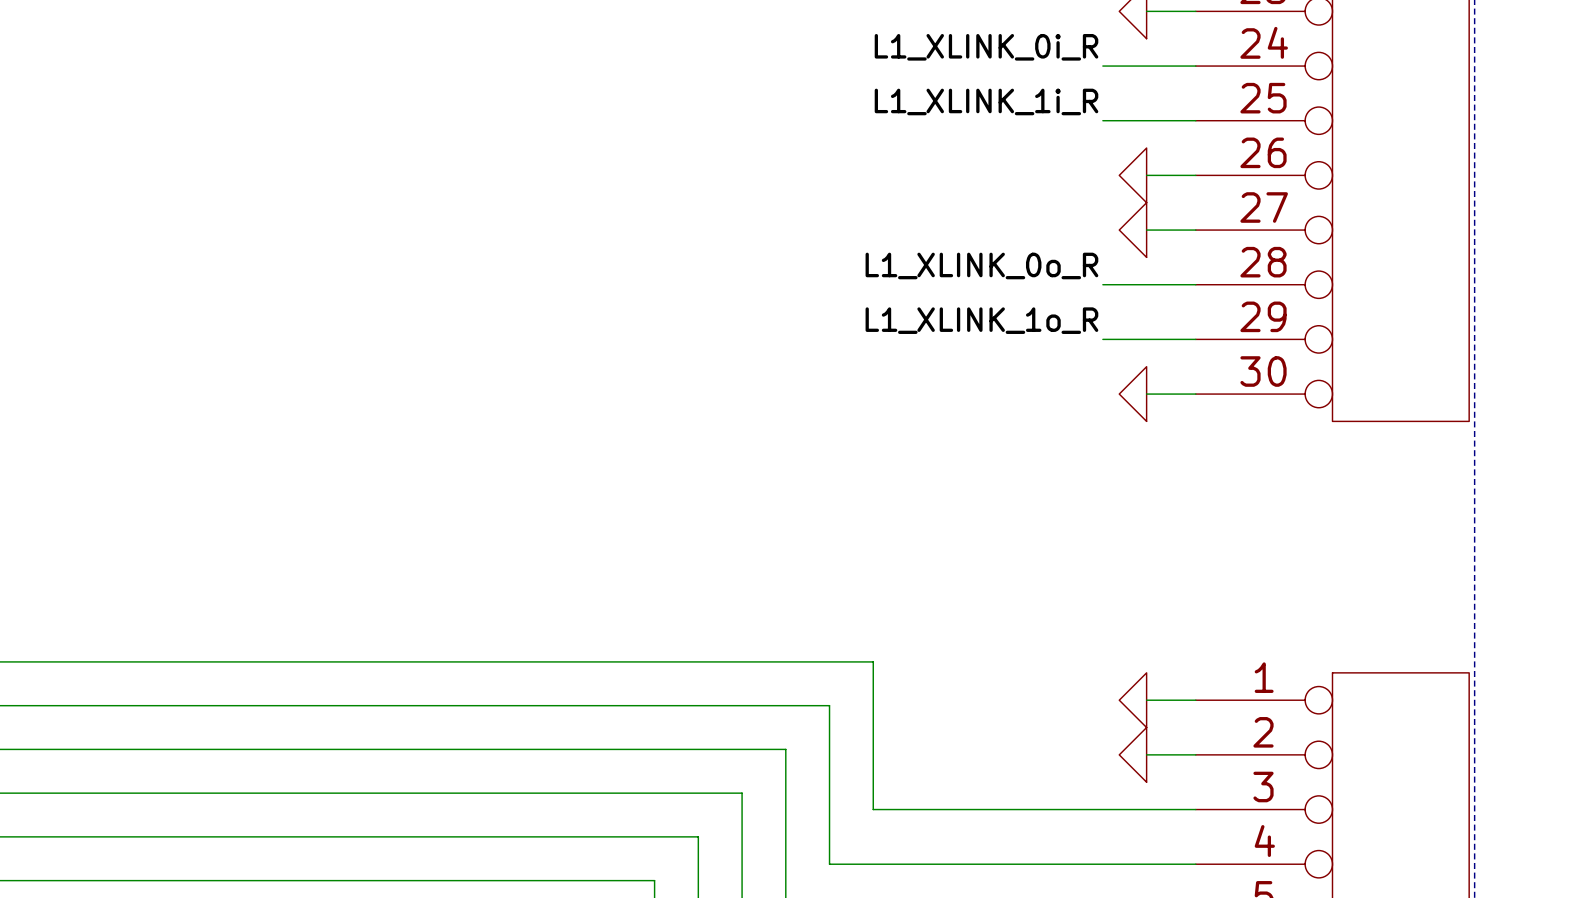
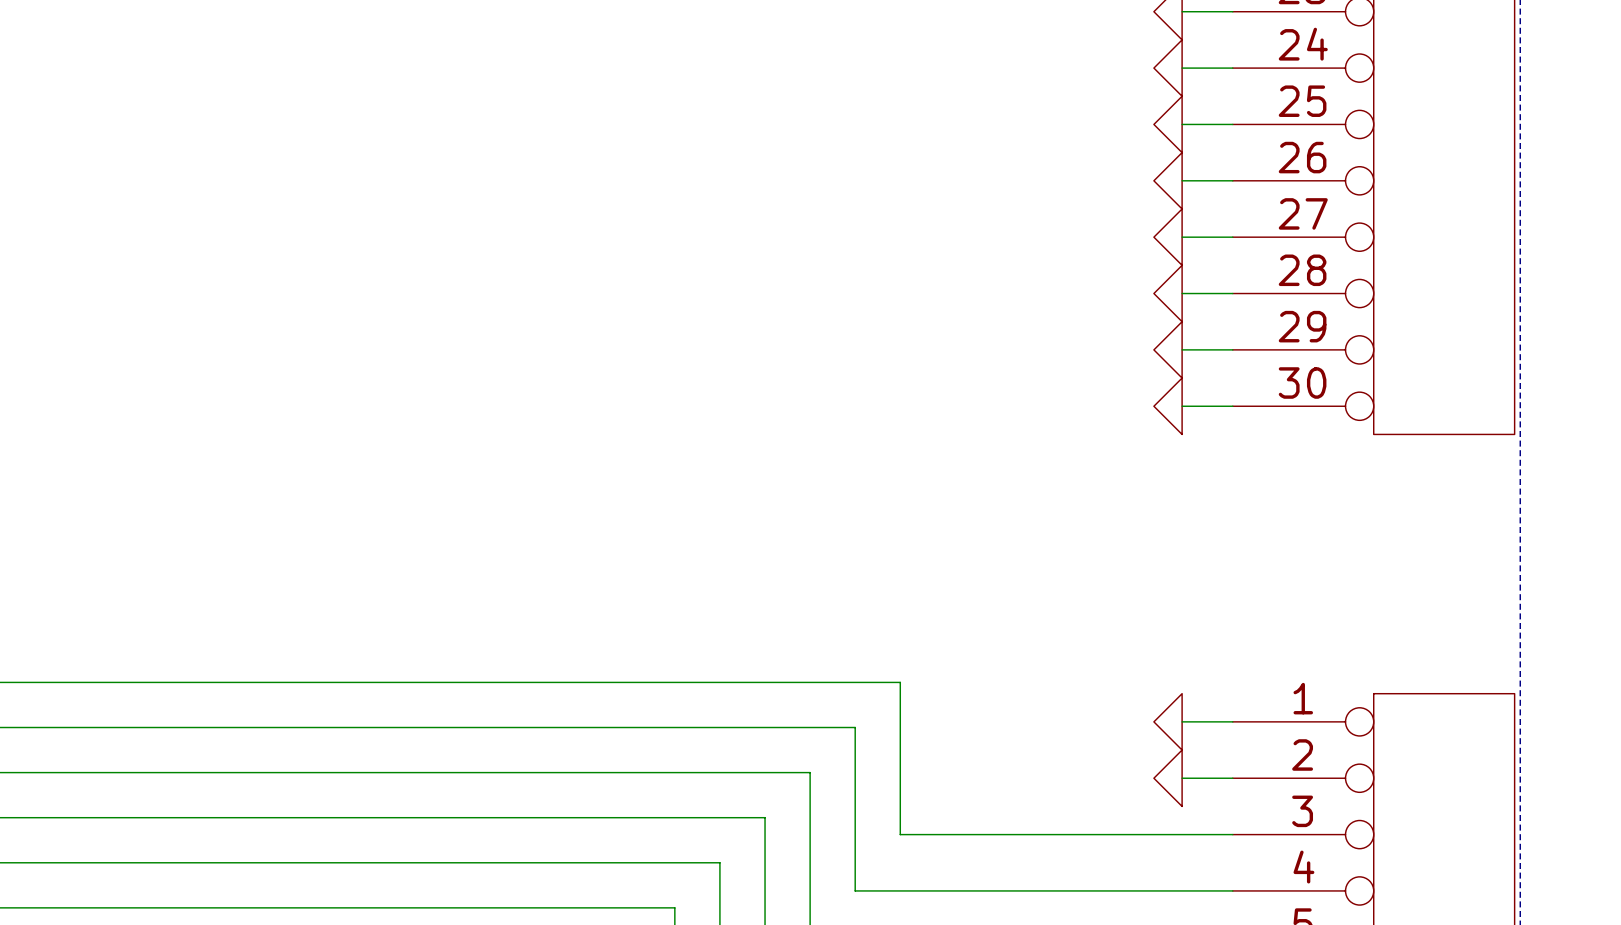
label: L1_XLINK_0i_R (986, 47) -> none
wire: (1102, 66) (1146, 66) -> none
power symbol: none -> (1168, 68)
label: L1_XLINK_1i_R (986, 101) -> none
wire: (1102, 120) (1146, 120) -> none
power symbol: none -> (1168, 124)
label: L1_XLINK_0o_R (981, 265) -> none
wire: (1102, 284) (1146, 284) -> none
power symbol: none -> (1168, 293)
label: L1_XLINK_1o_R (981, 320) -> none
wire: (1102, 339) (1146, 339) -> none
power symbol: none -> (1168, 349)

